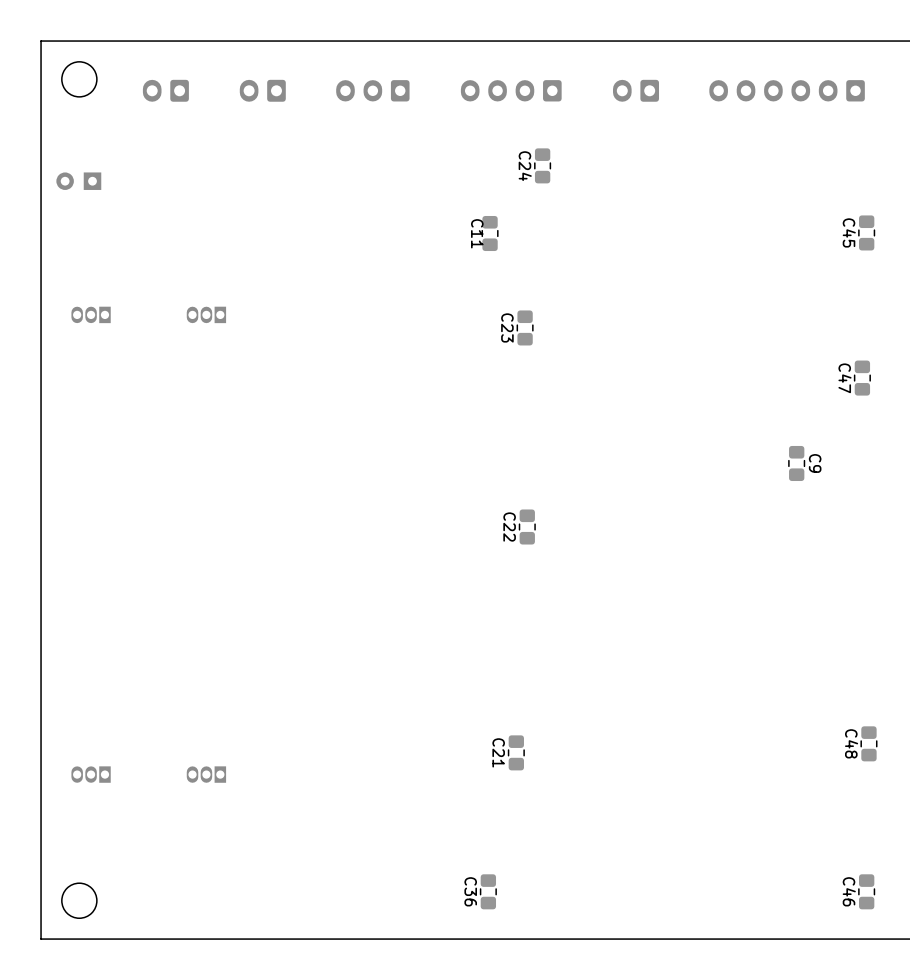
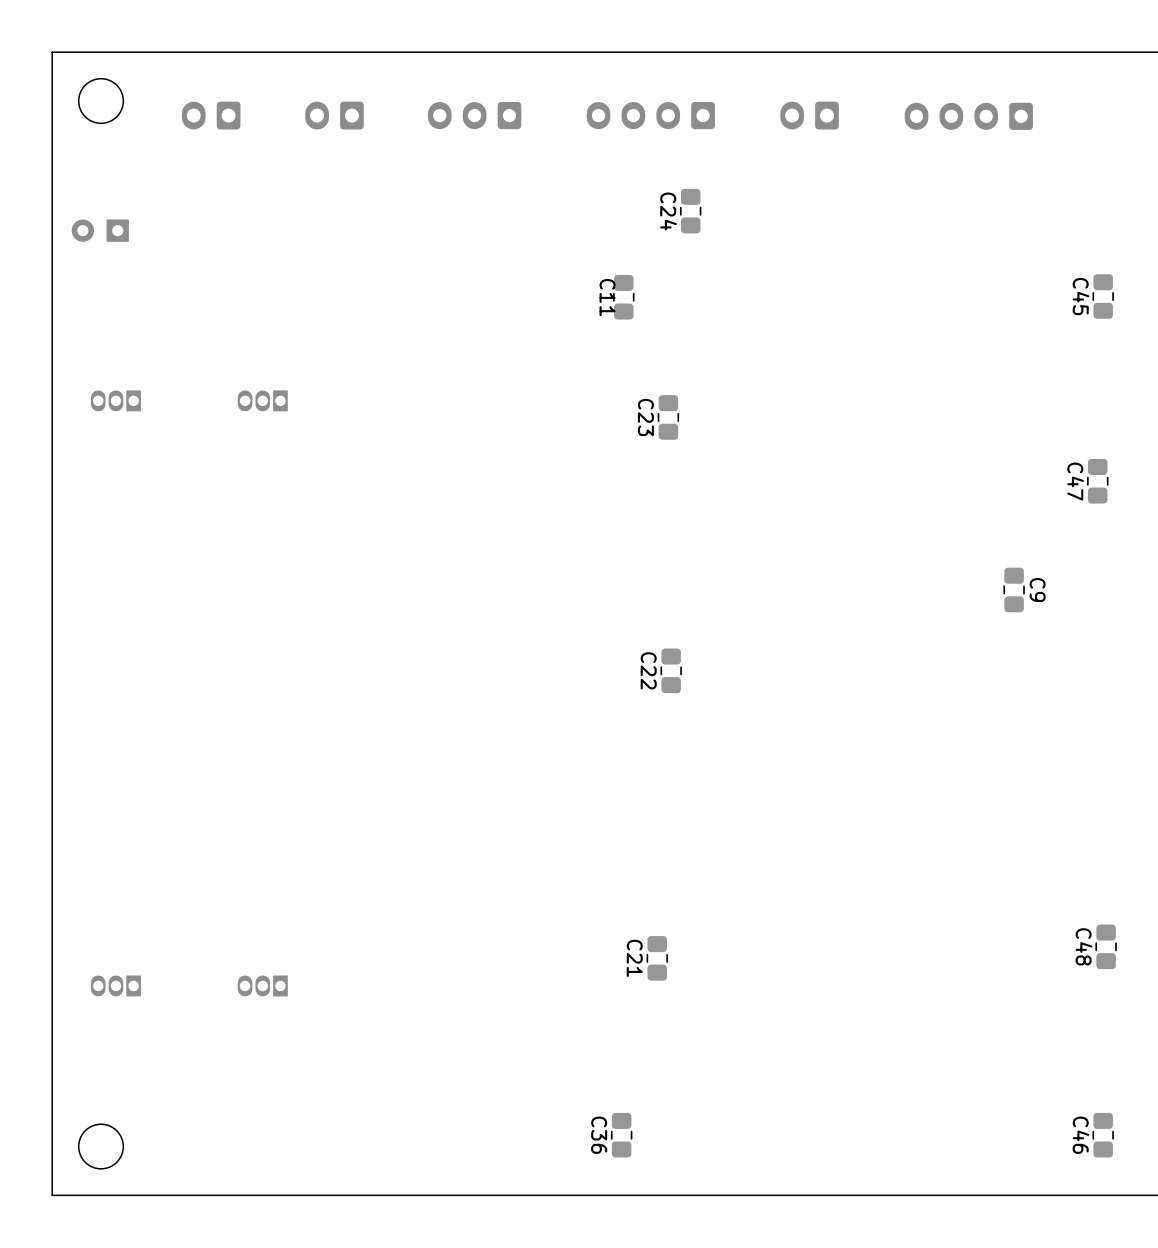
part: (787, 90) -> none
part: none -> (968, 116)

